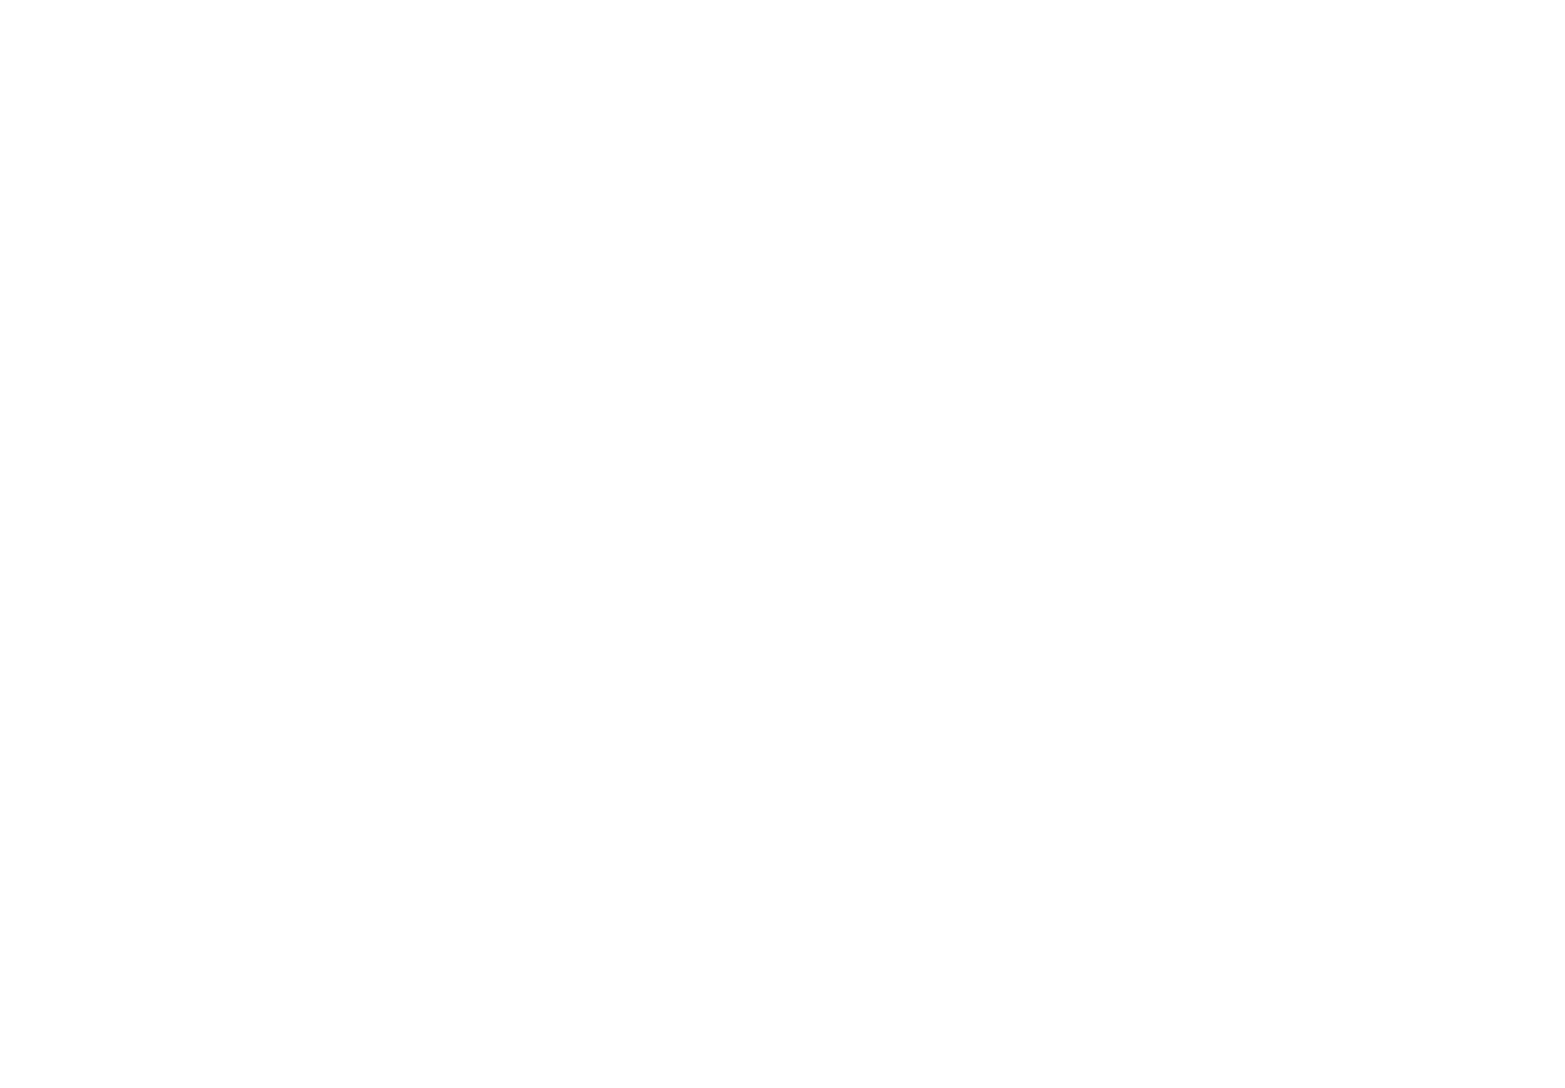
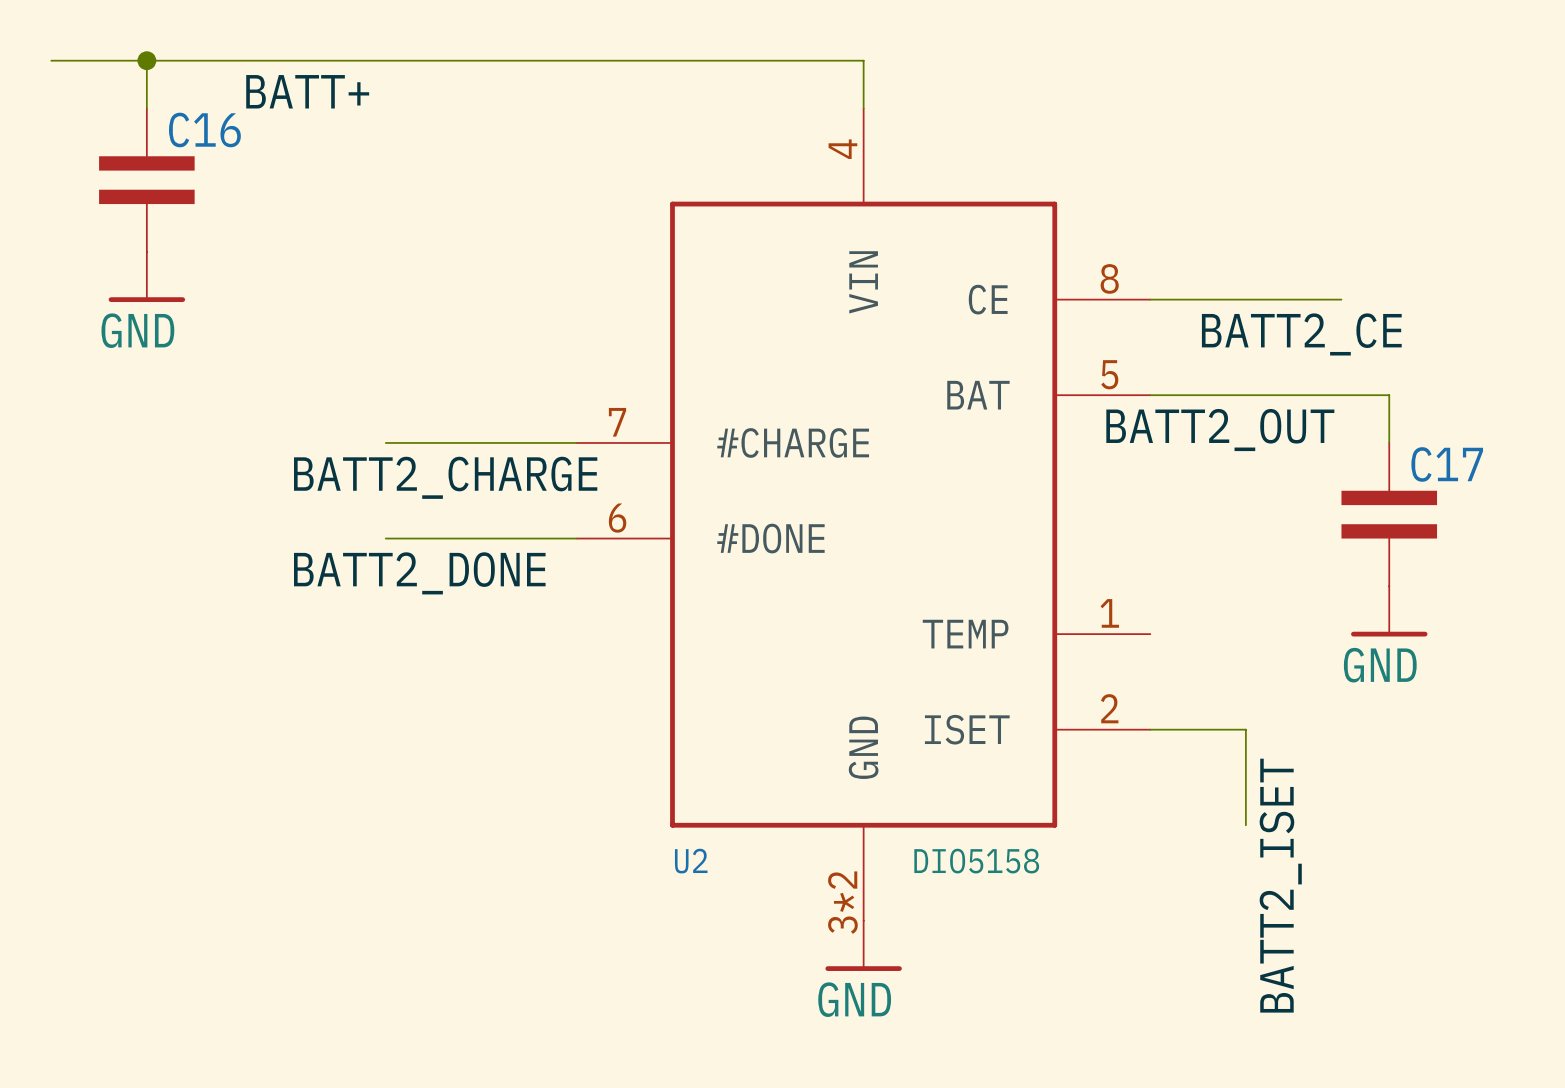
wire: none -> (51, 60) (863, 60) (863, 108)
wire: none -> (146, 60) (146, 108)
junction: none -> (146, 60)
label: none -> BATT+ (307, 91)
C16: none -> (146, 180)
power symbol: none -> GND (146, 276)
wire: none -> (1150, 299) (1341, 299)
label: none -> BATT2_CE (1301, 334)
wire: none -> (1150, 395) (1389, 395) (1389, 442)
label: none -> BATT2_OUT (1220, 430)
wire: none -> (385, 442) (576, 442)
label: none -> BATT2_CHARGE (445, 477)
U2: none -> (863, 514)
C17: none -> (1389, 514)
wire: none -> (385, 538) (576, 538)
label: none -> BATT2_DONE (419, 573)
power symbol: none -> GND (1389, 611)
wire: none -> (1150, 729) (1245, 729) (1245, 825)
label: none -> BATT2_ISET (1280, 885)
power symbol: none -> GND (863, 945)

